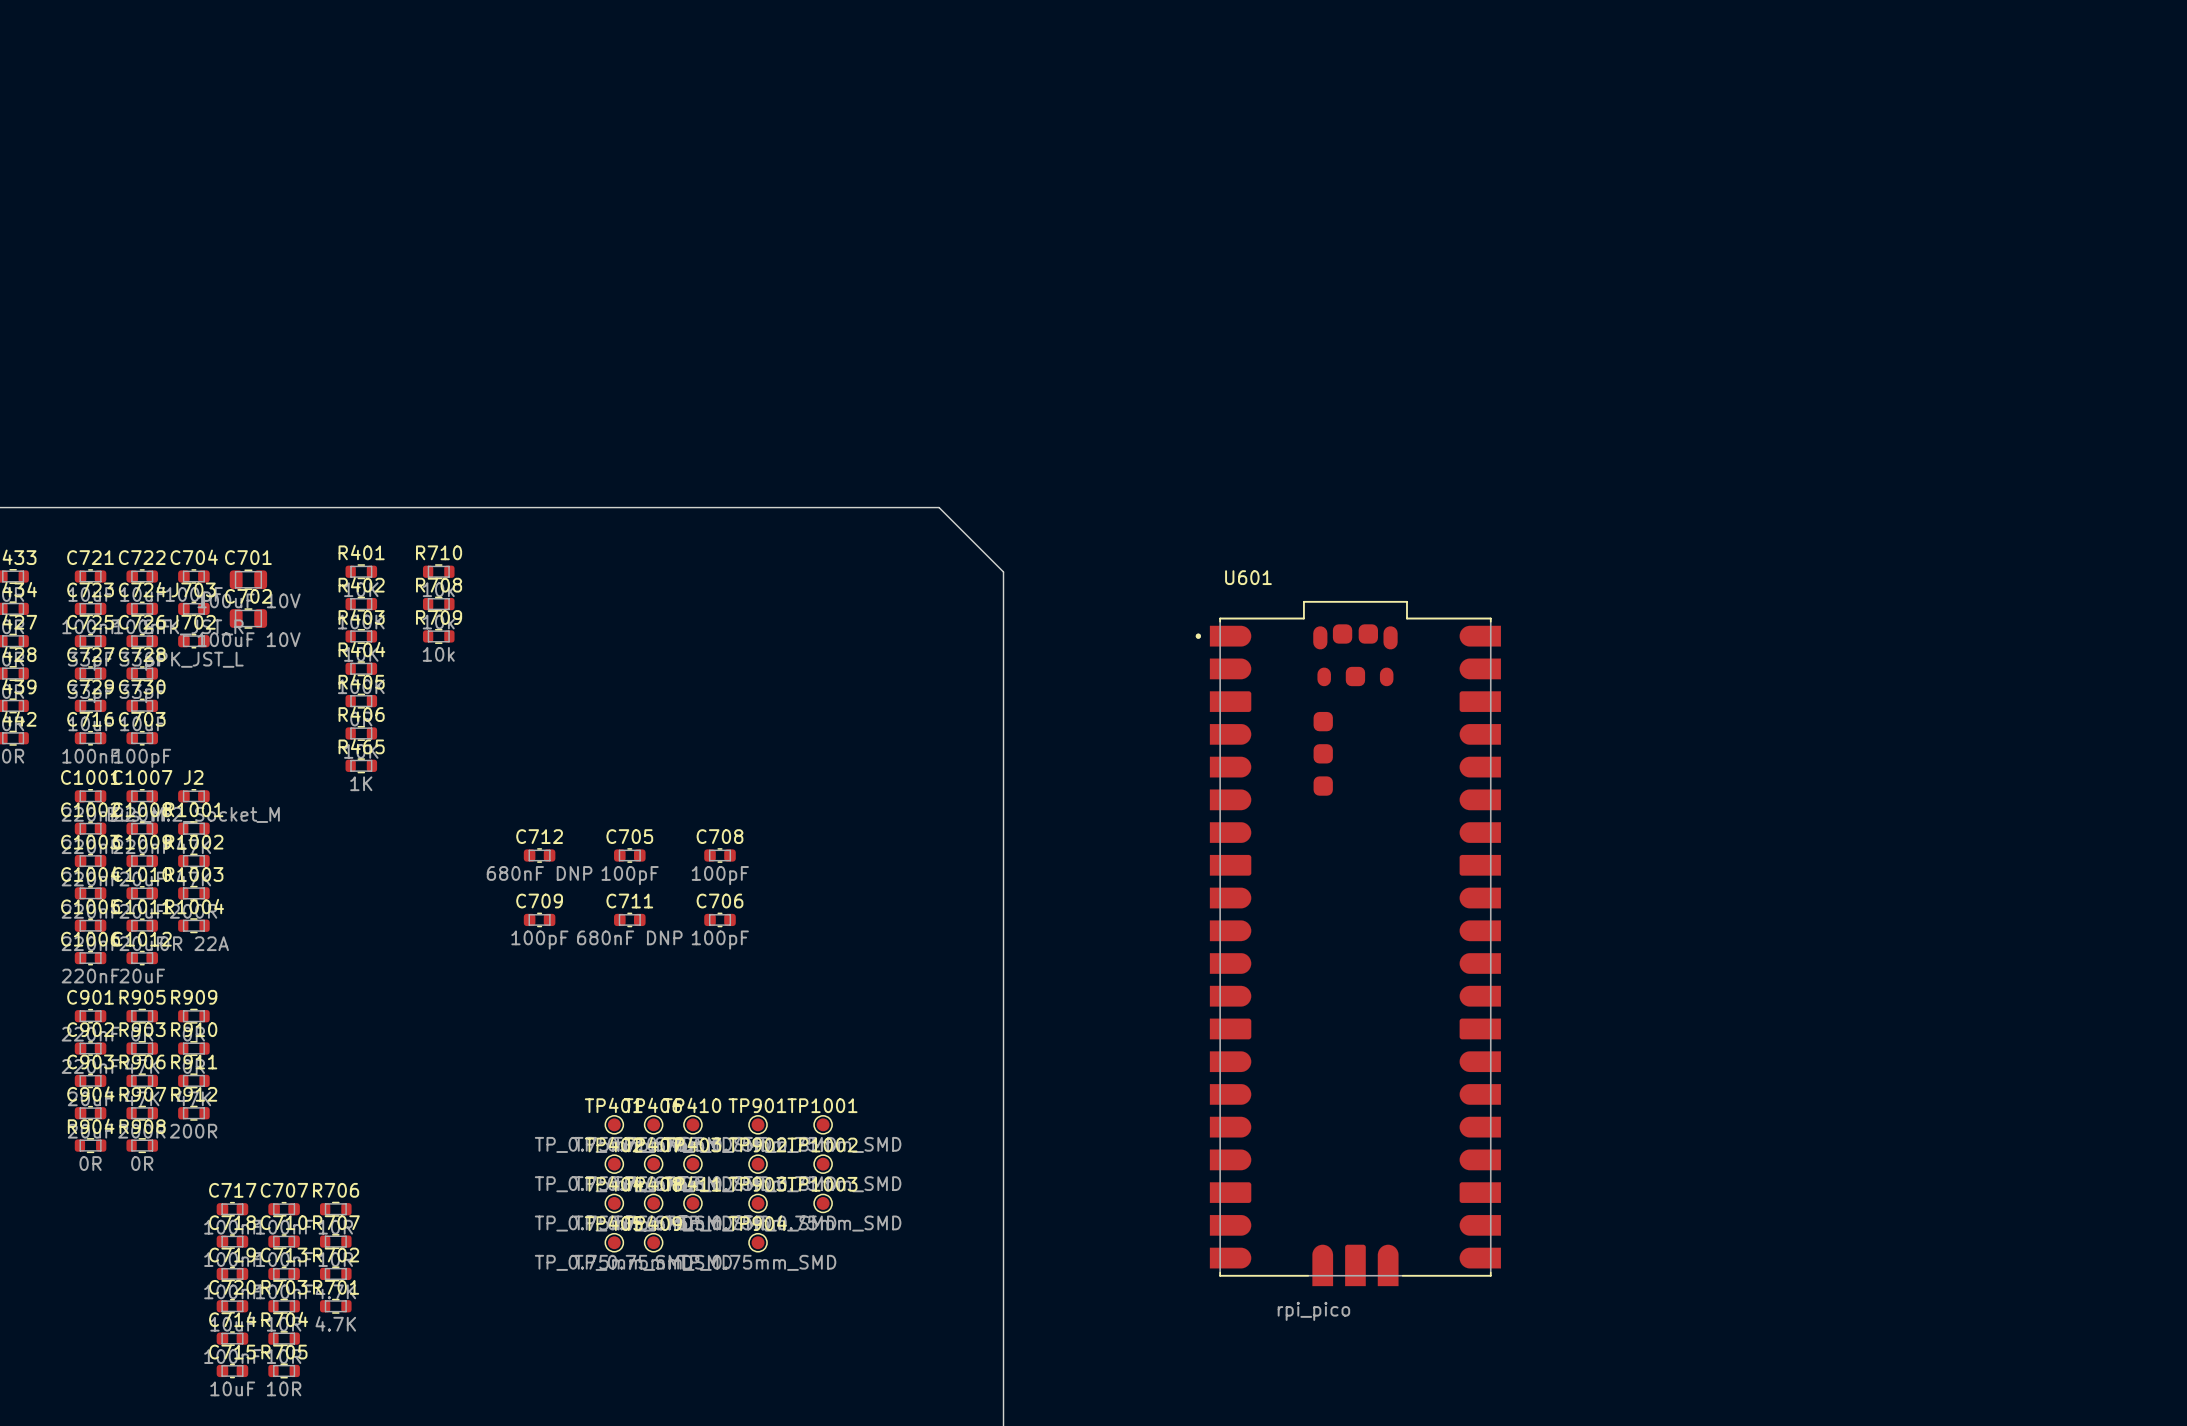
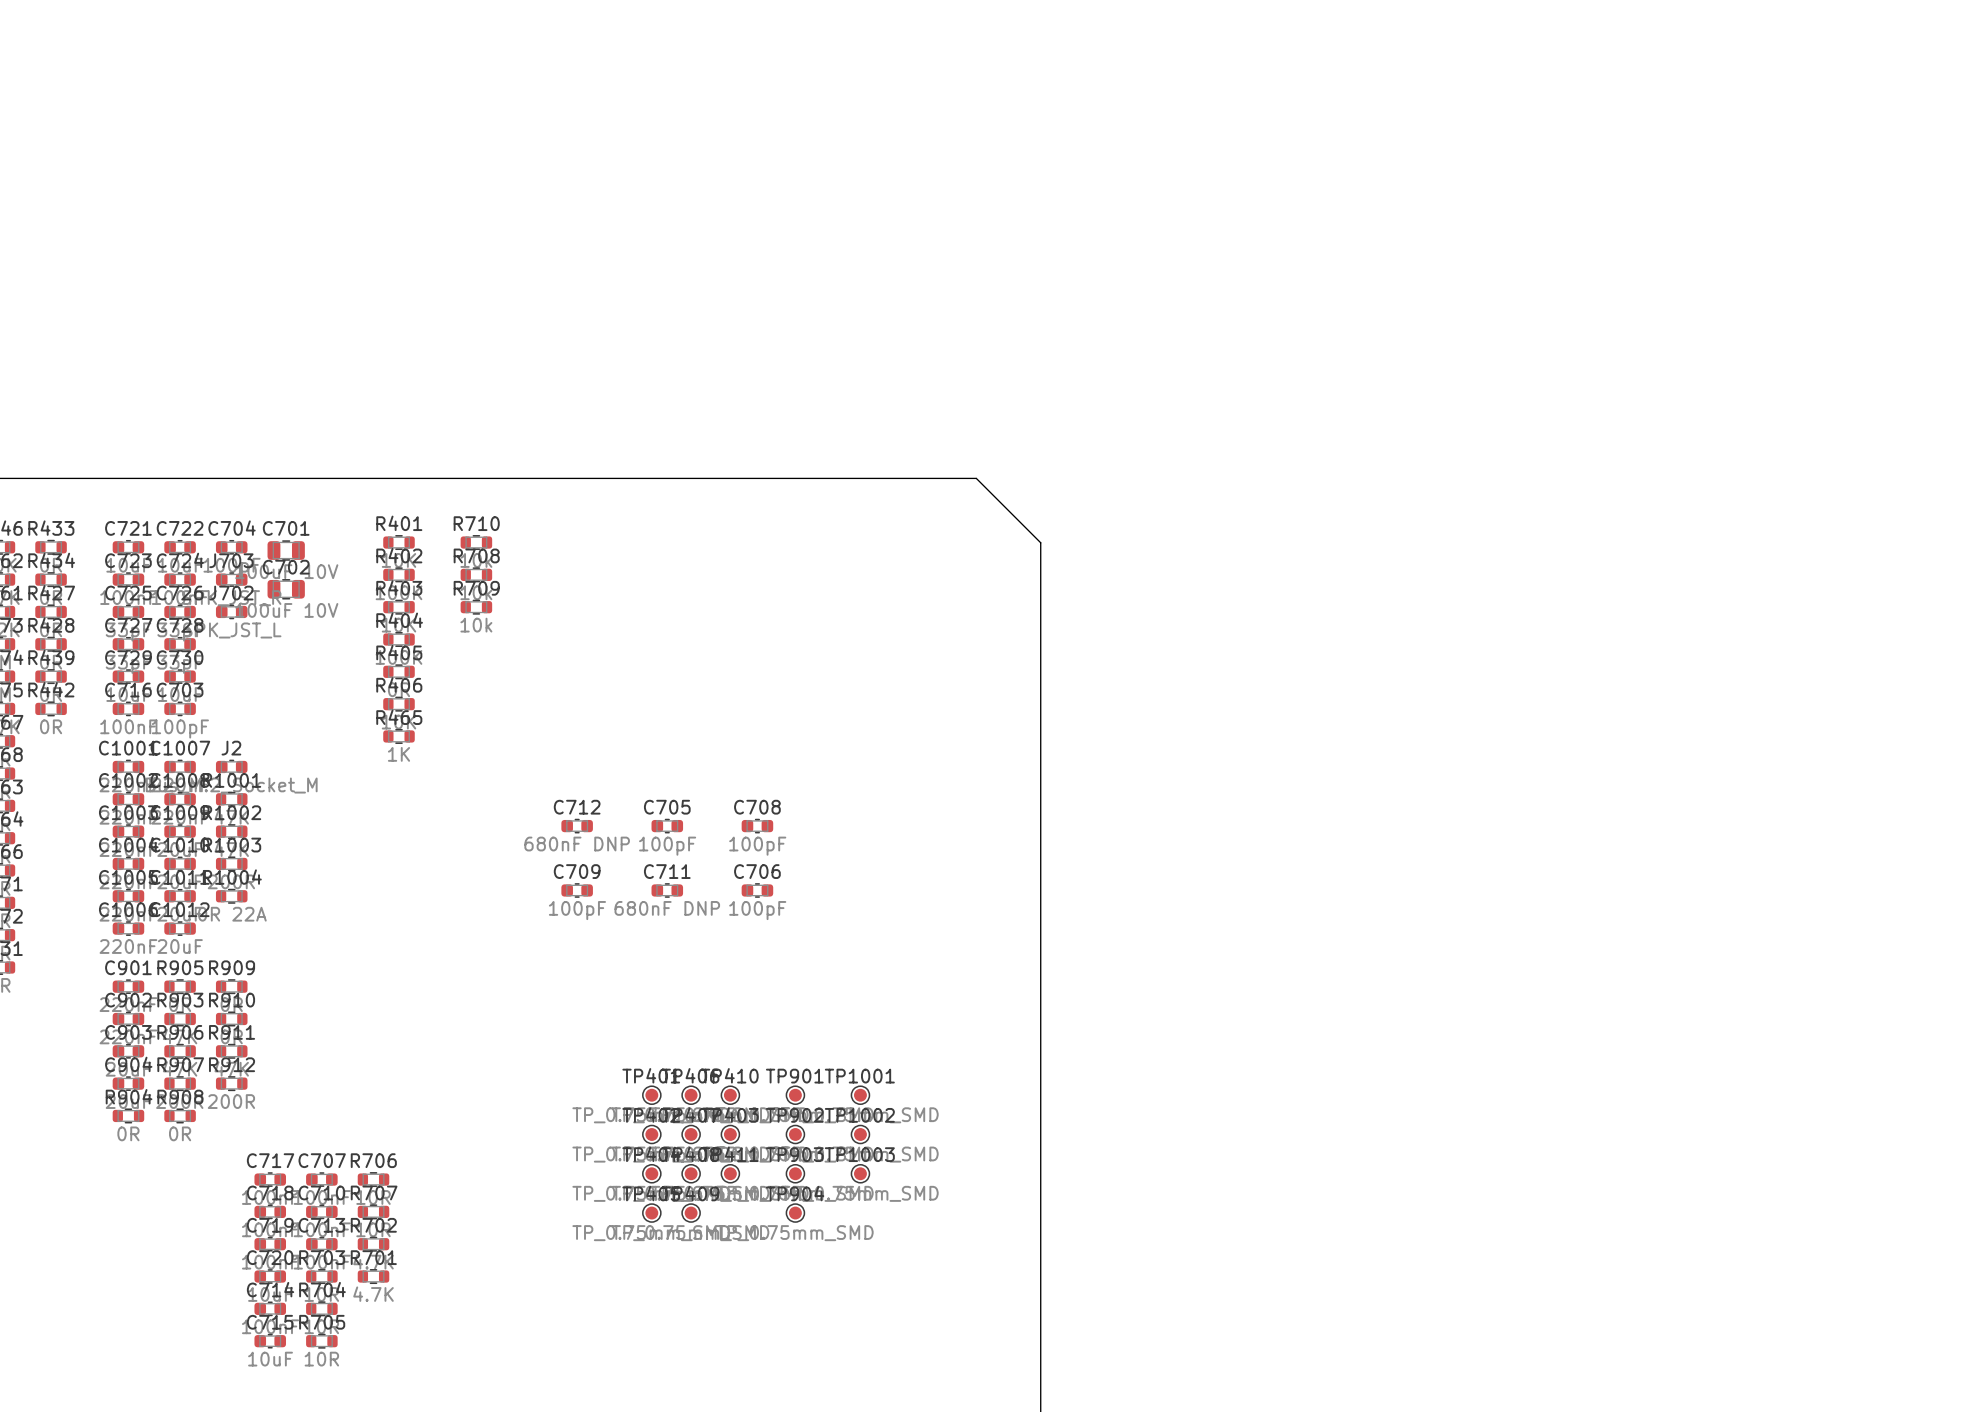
U601: rpi_pico (1348, 943) -> none

